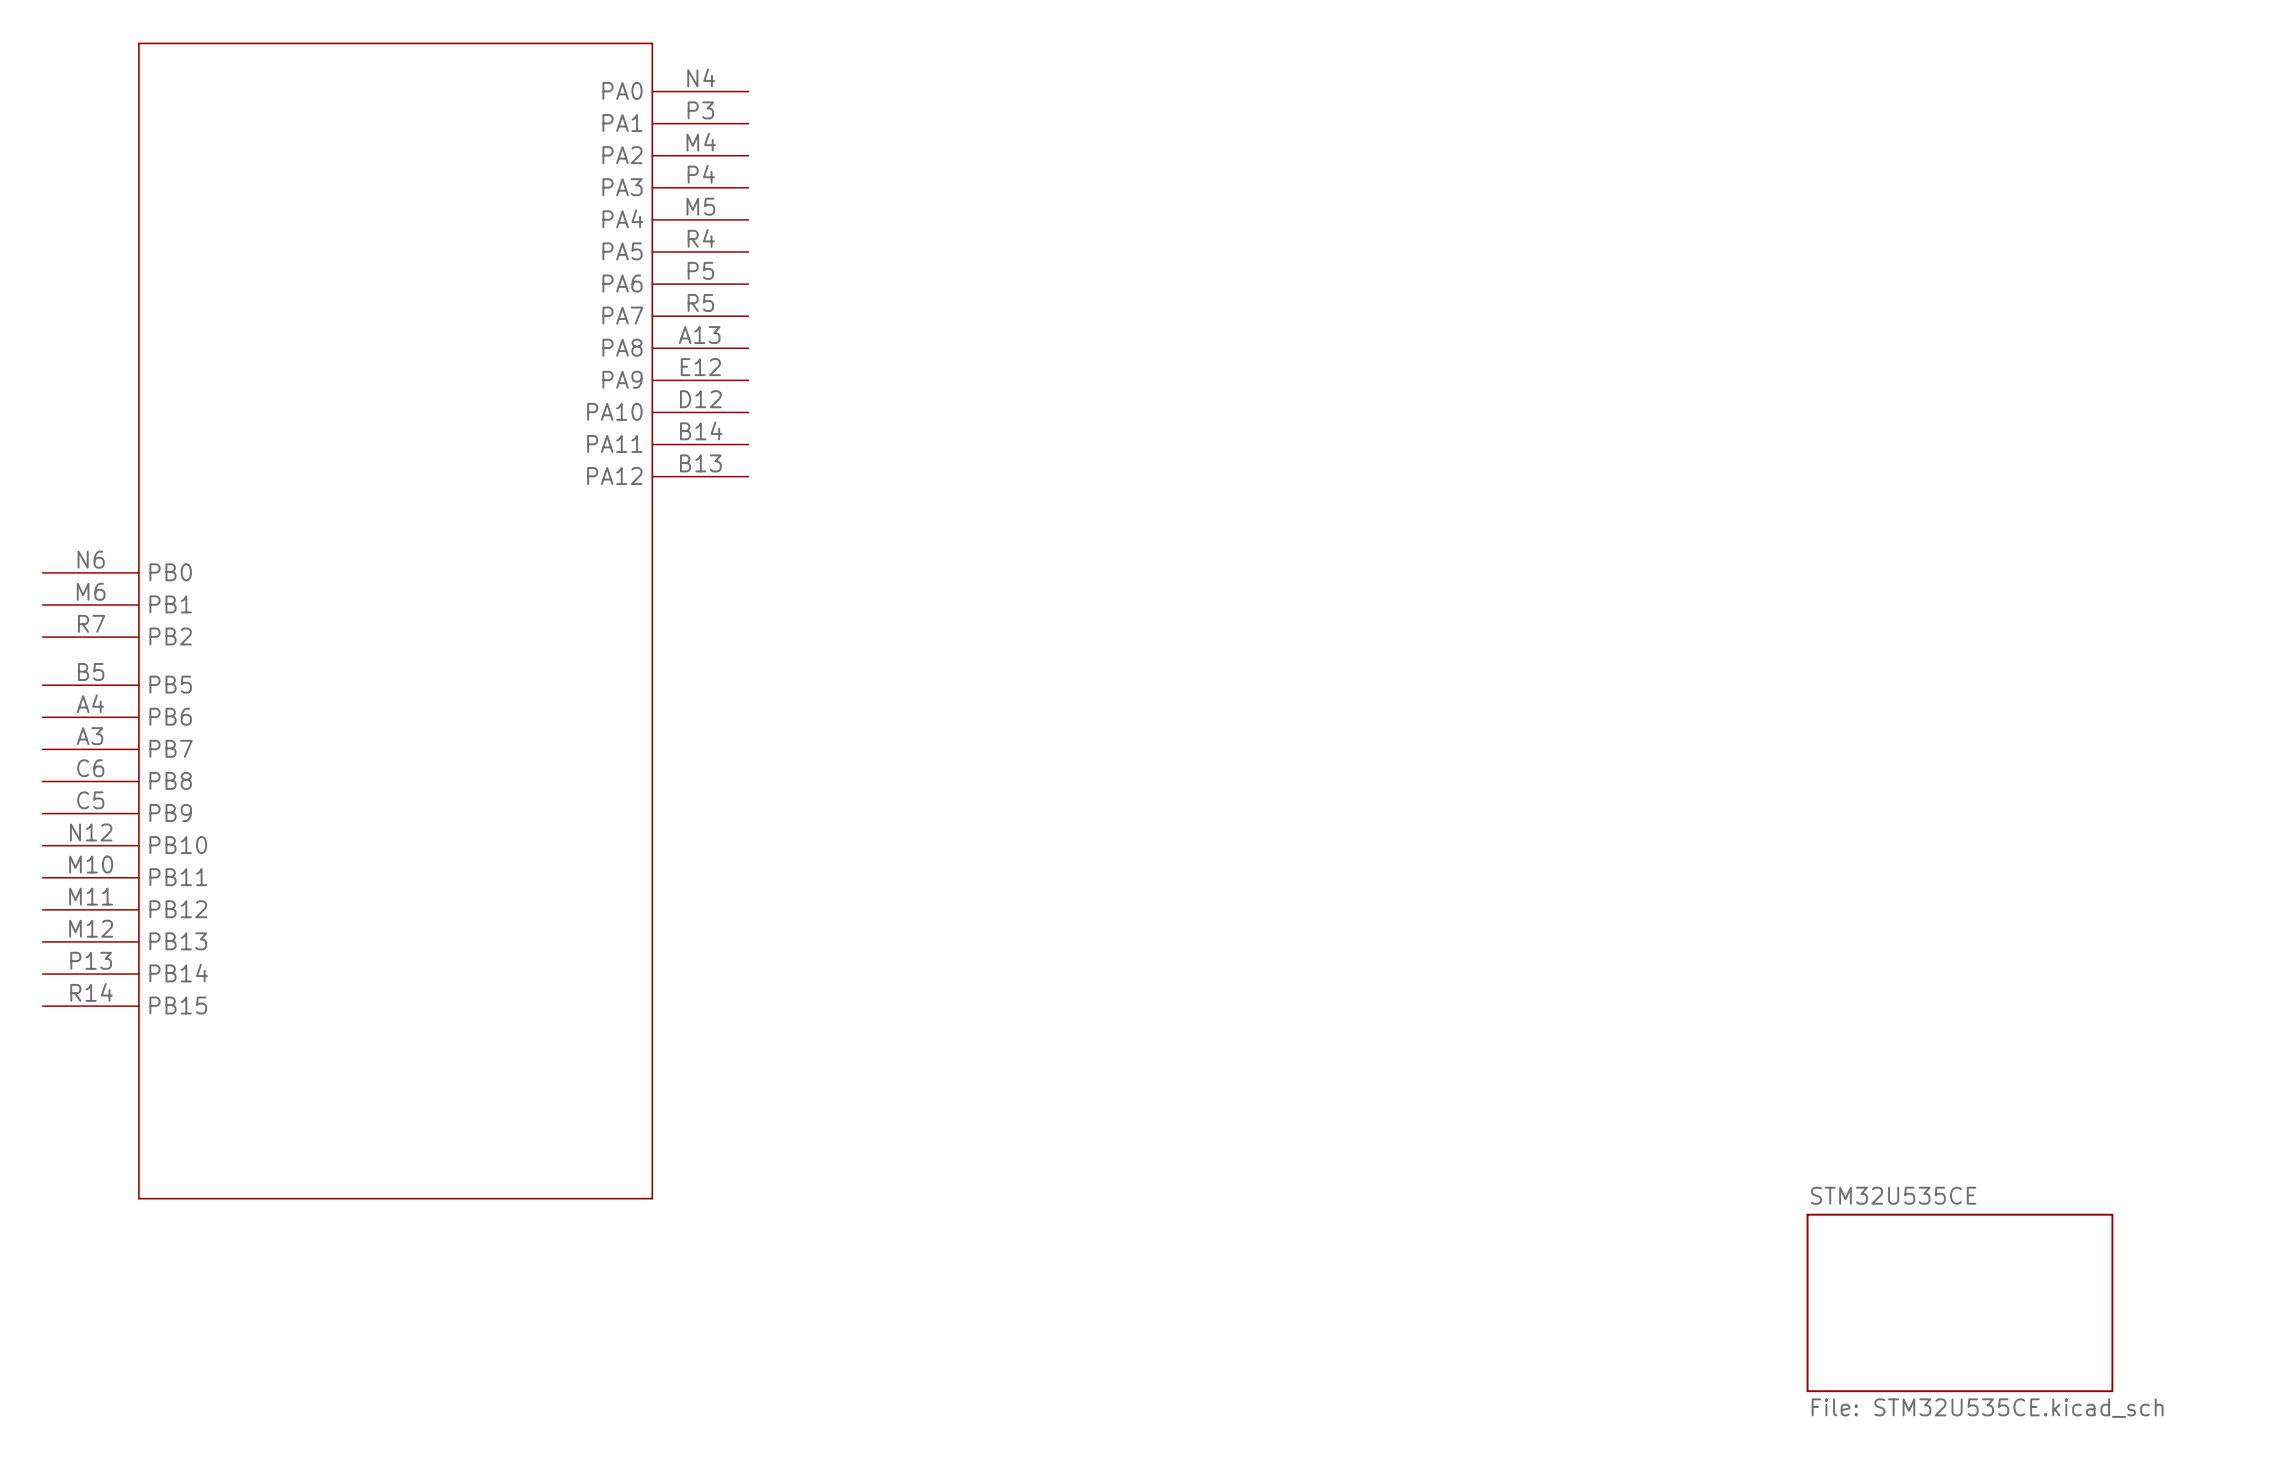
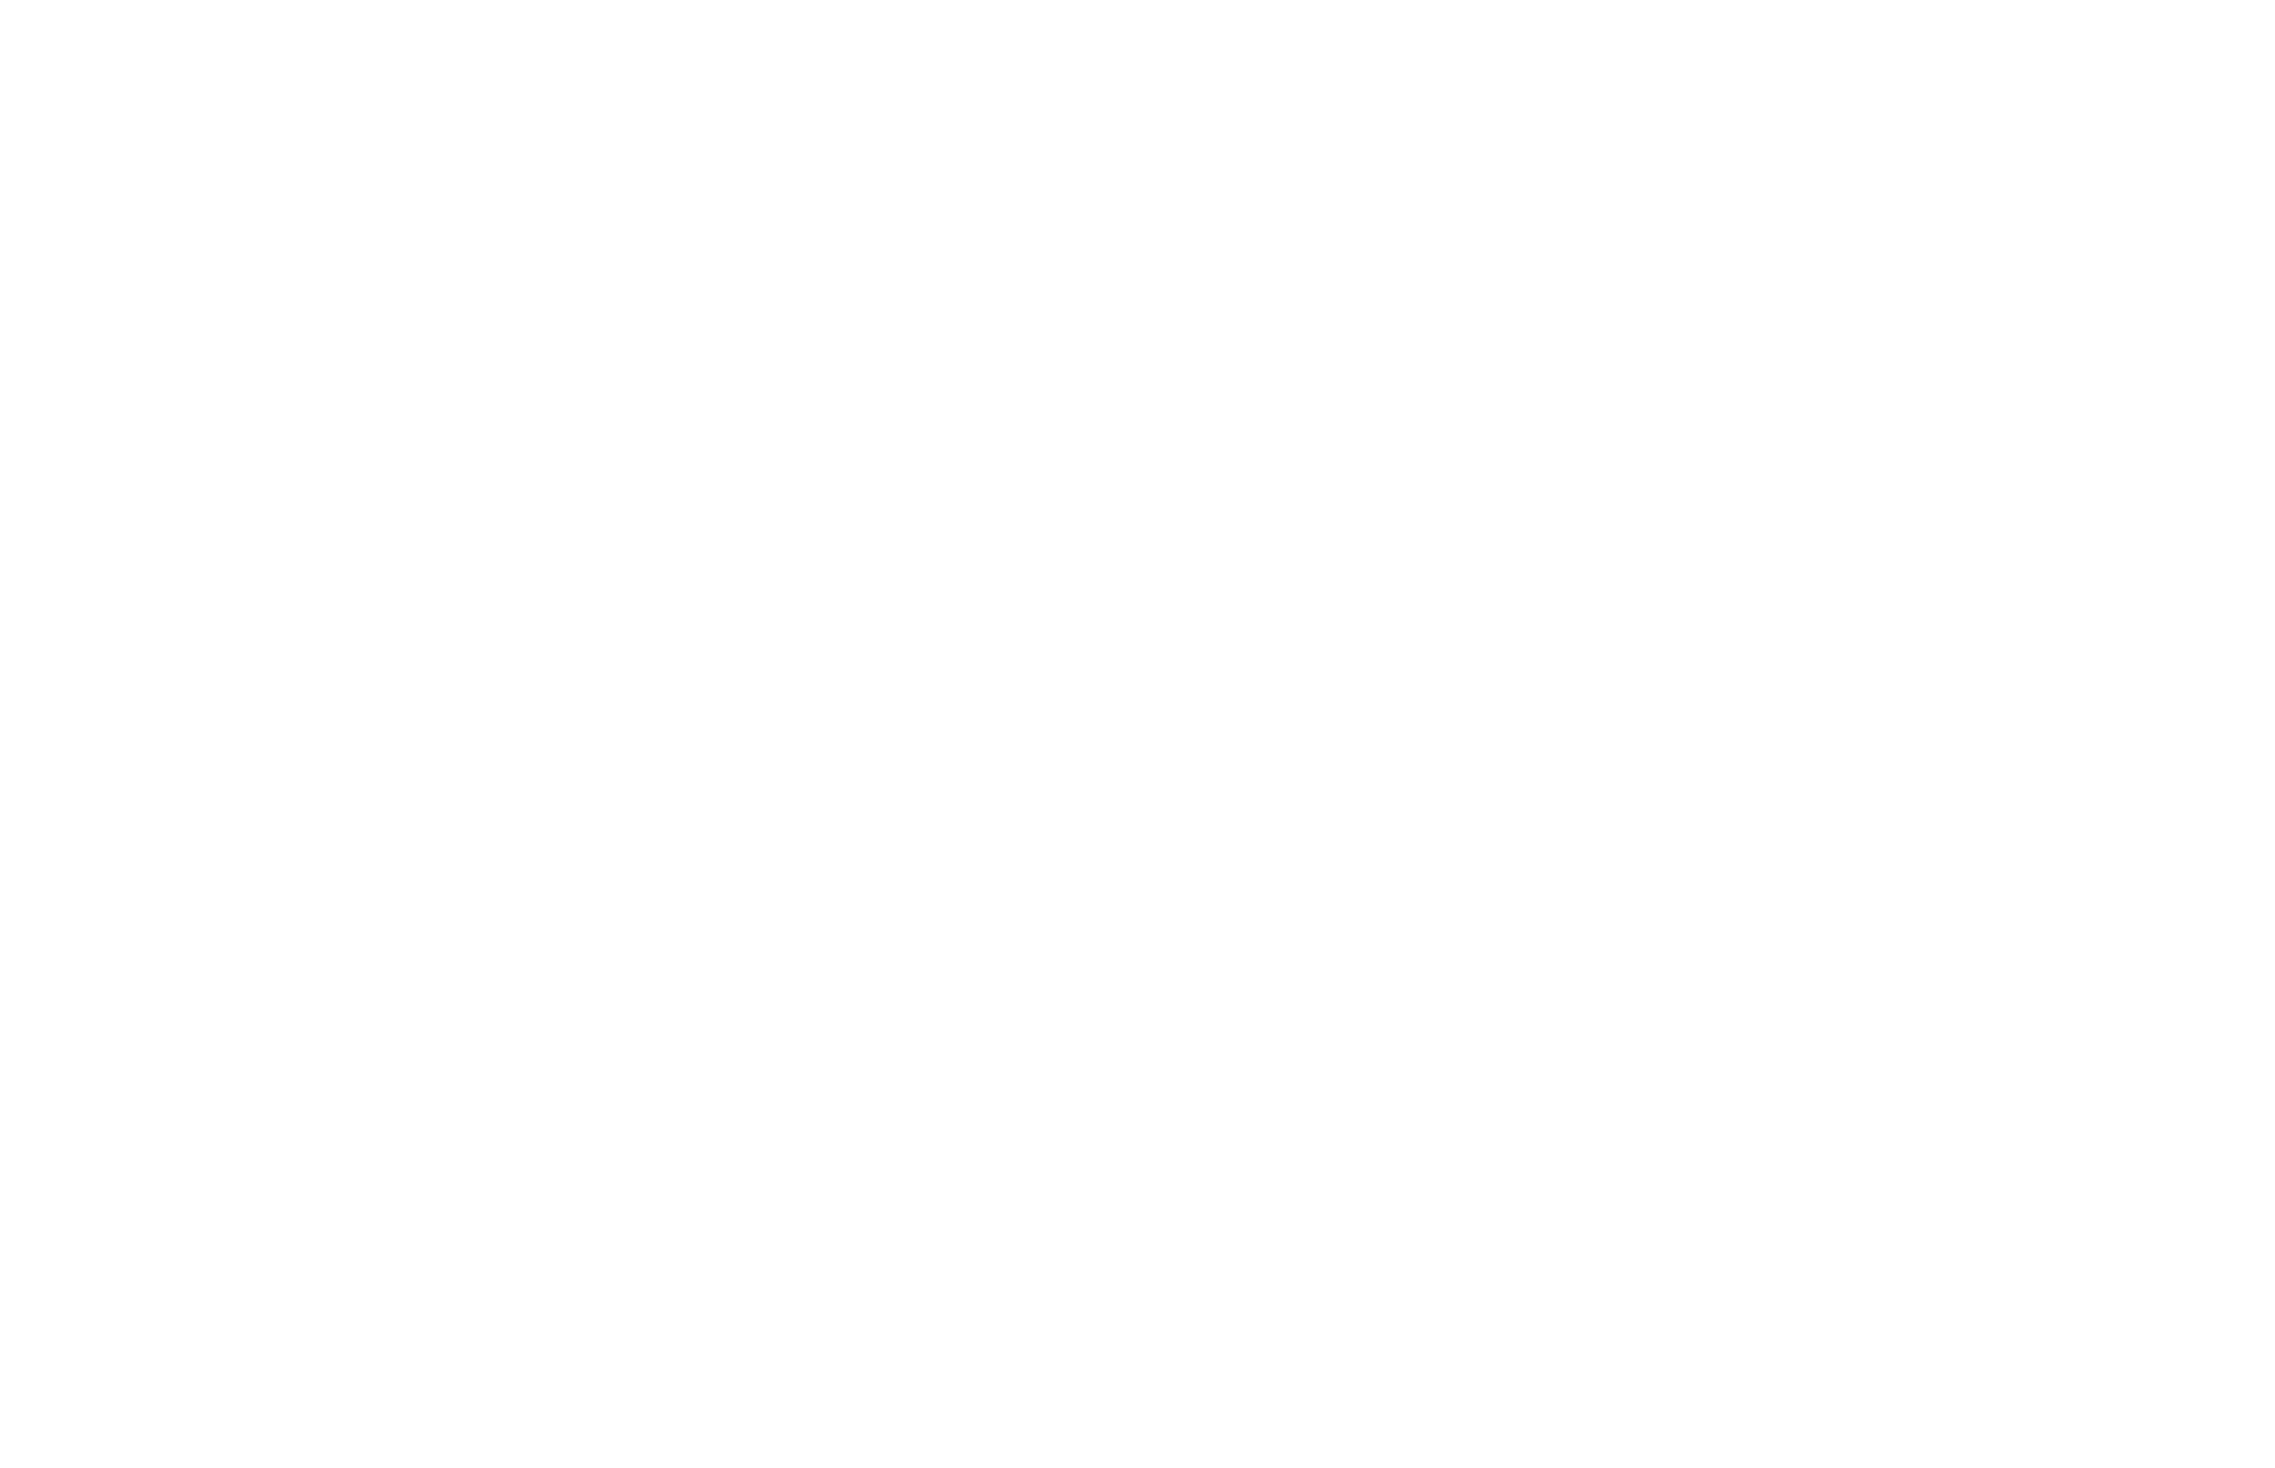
part: (395, 621) -> none
sheet STM32U535CE: File: STM32U535CE.kicad_sch (1959, 1302) -> none

